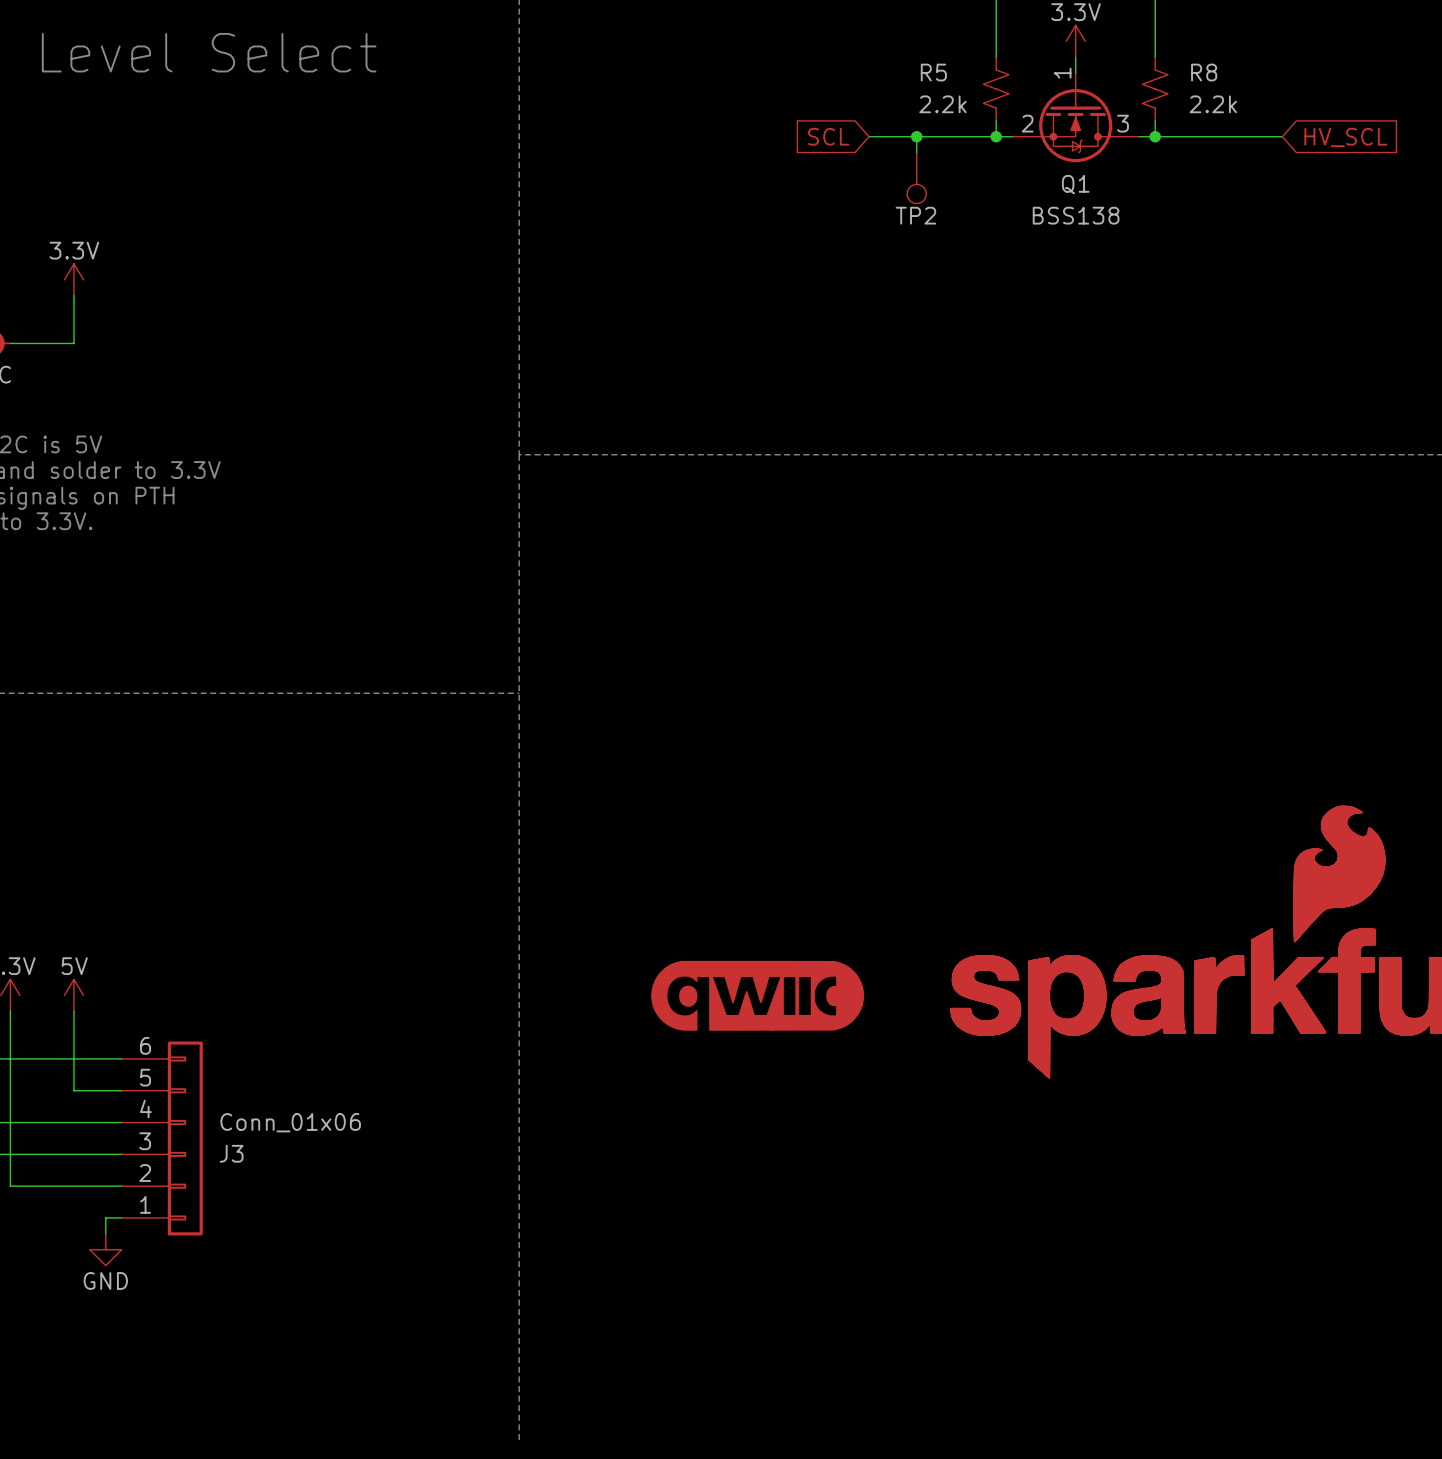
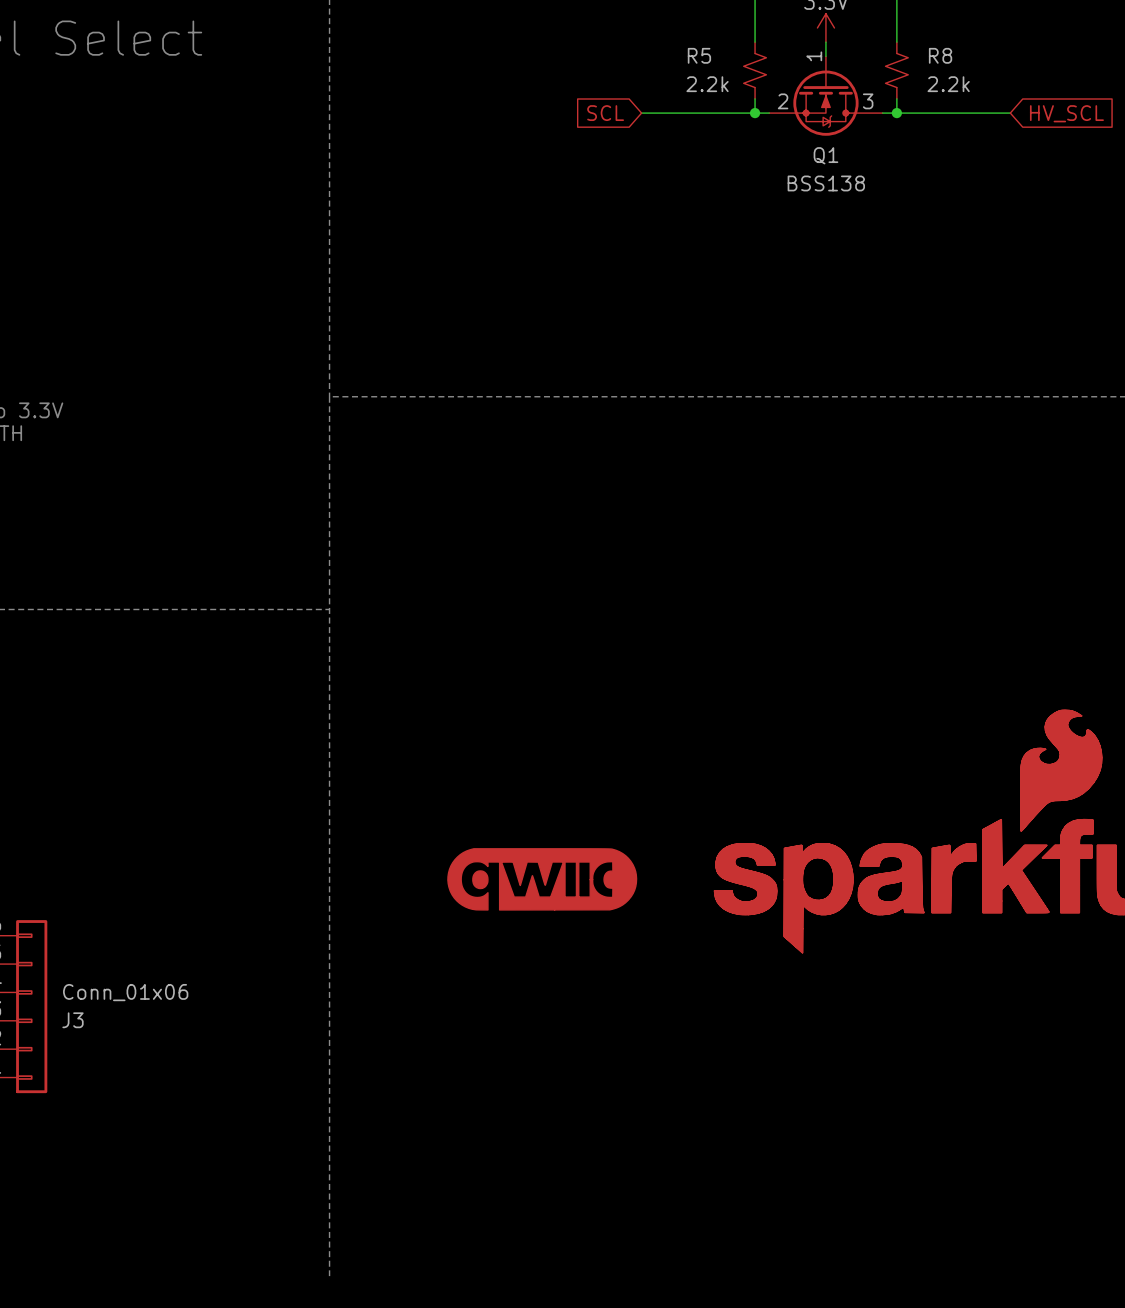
wire: (916, 136) (916, 152) -> none
junction: (916, 136) -> none
TP2: (916, 178) -> none

